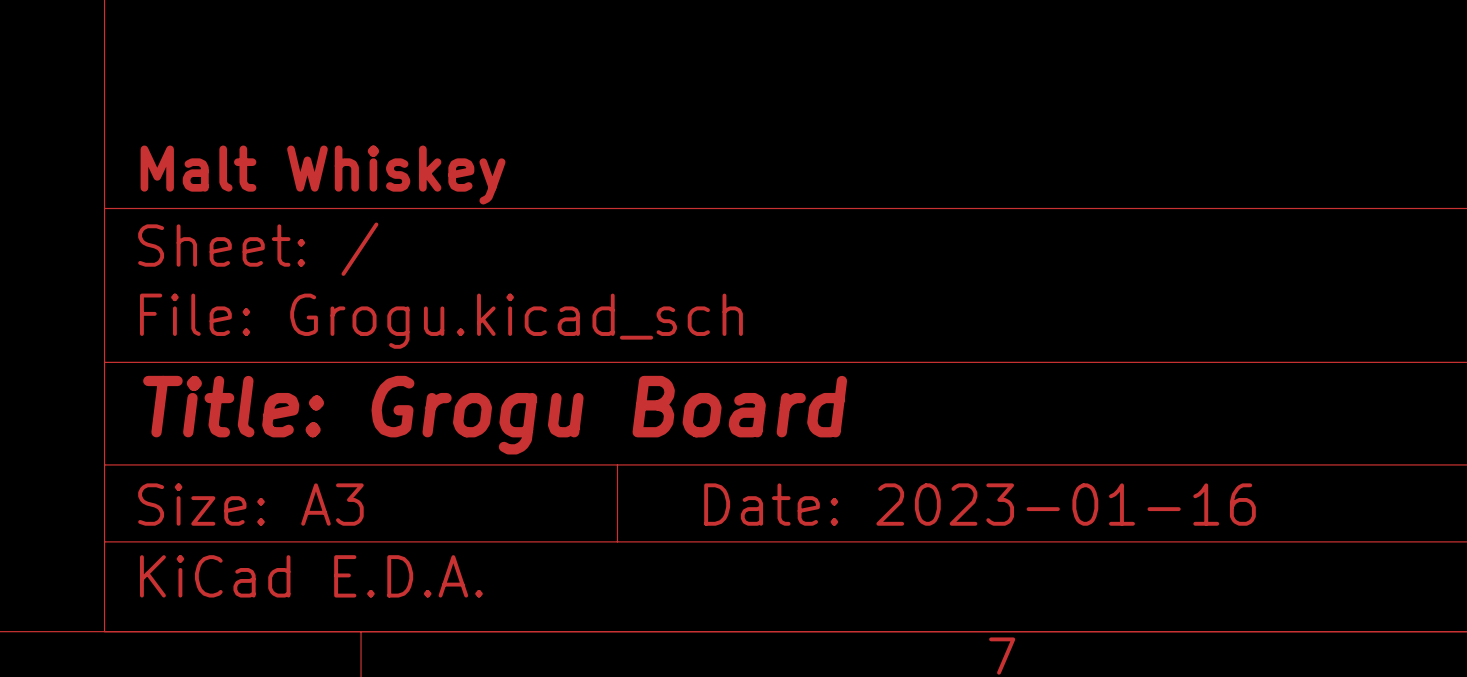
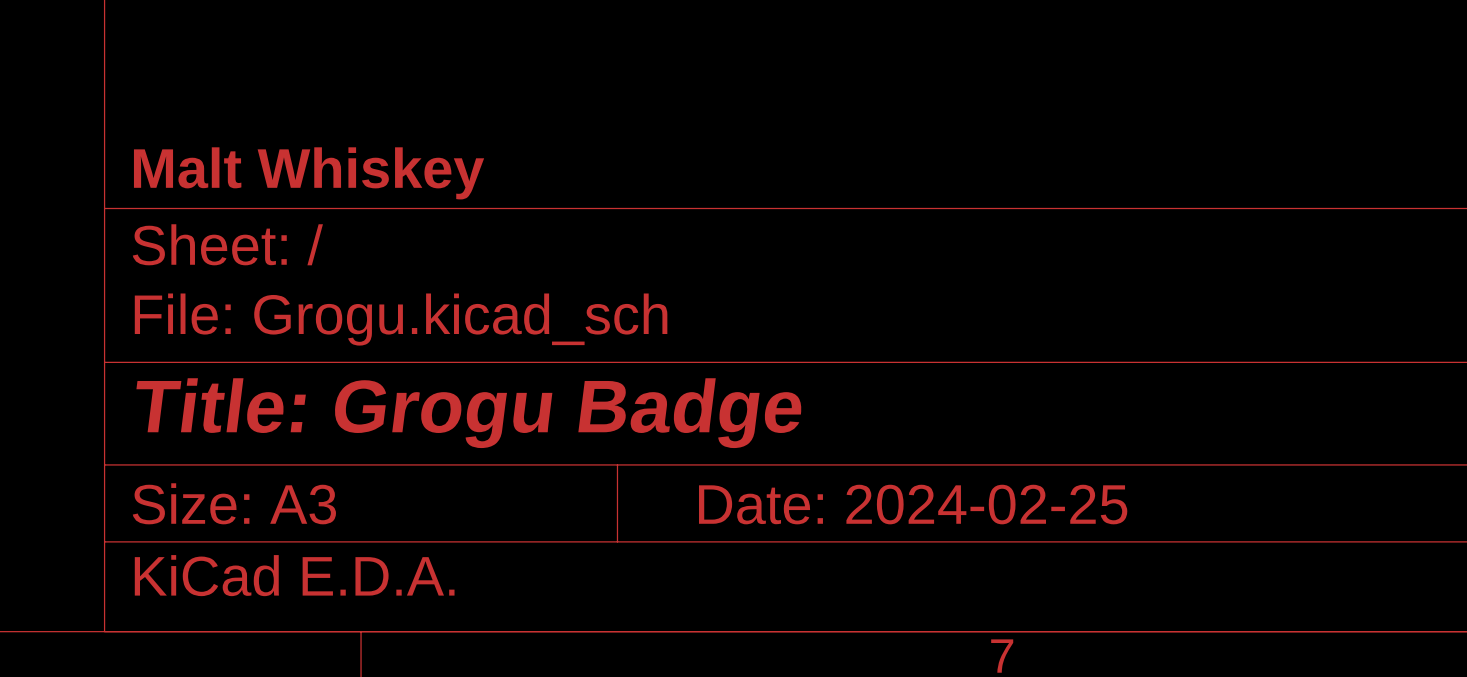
title block: Title: Grogu Board (495, 415) -> Title: Grogu Badge (469, 413)
title block: Date: 2023-01-16 (980, 504) -> Date: 2024-02-25 (913, 504)

